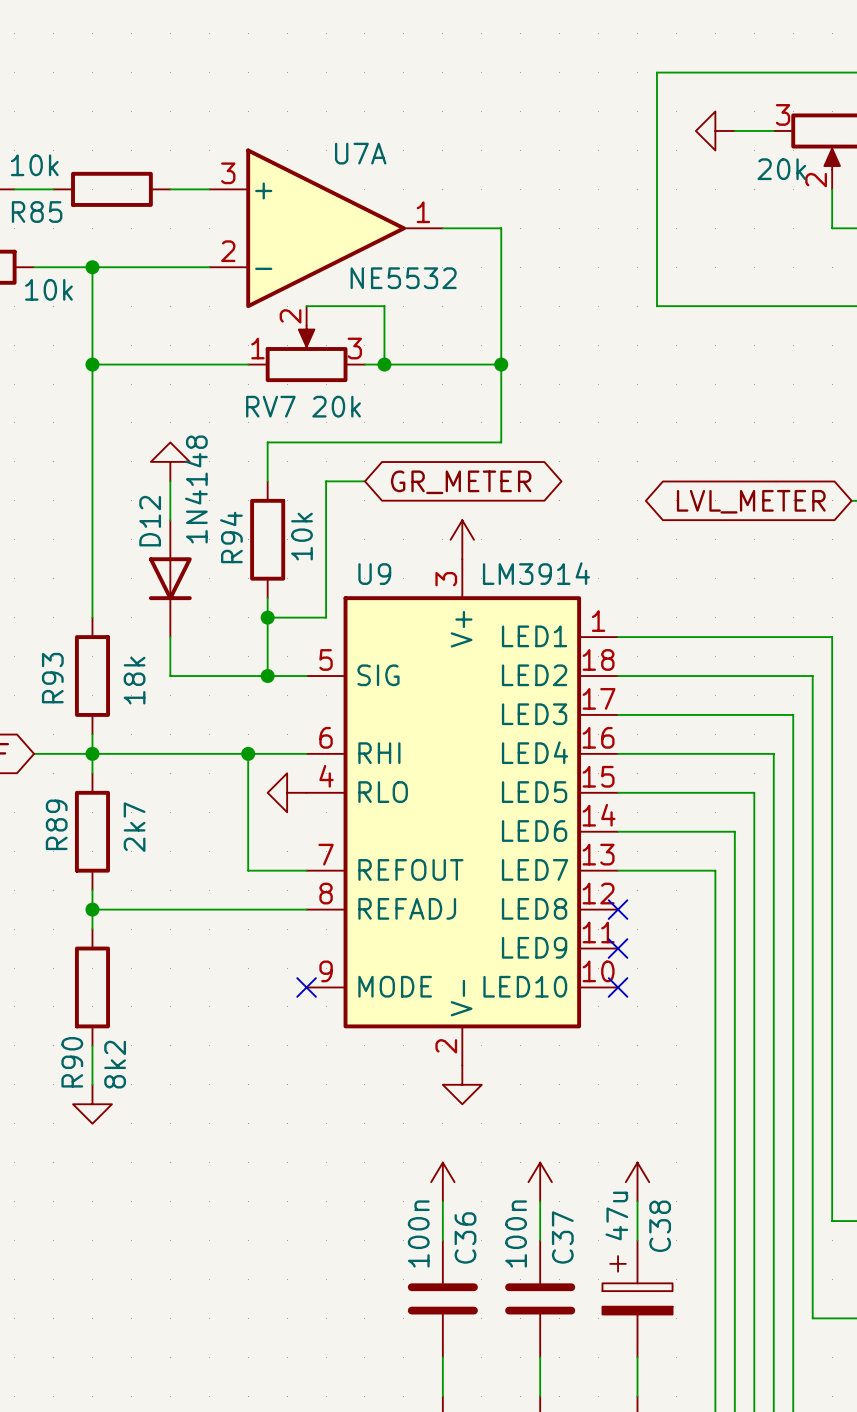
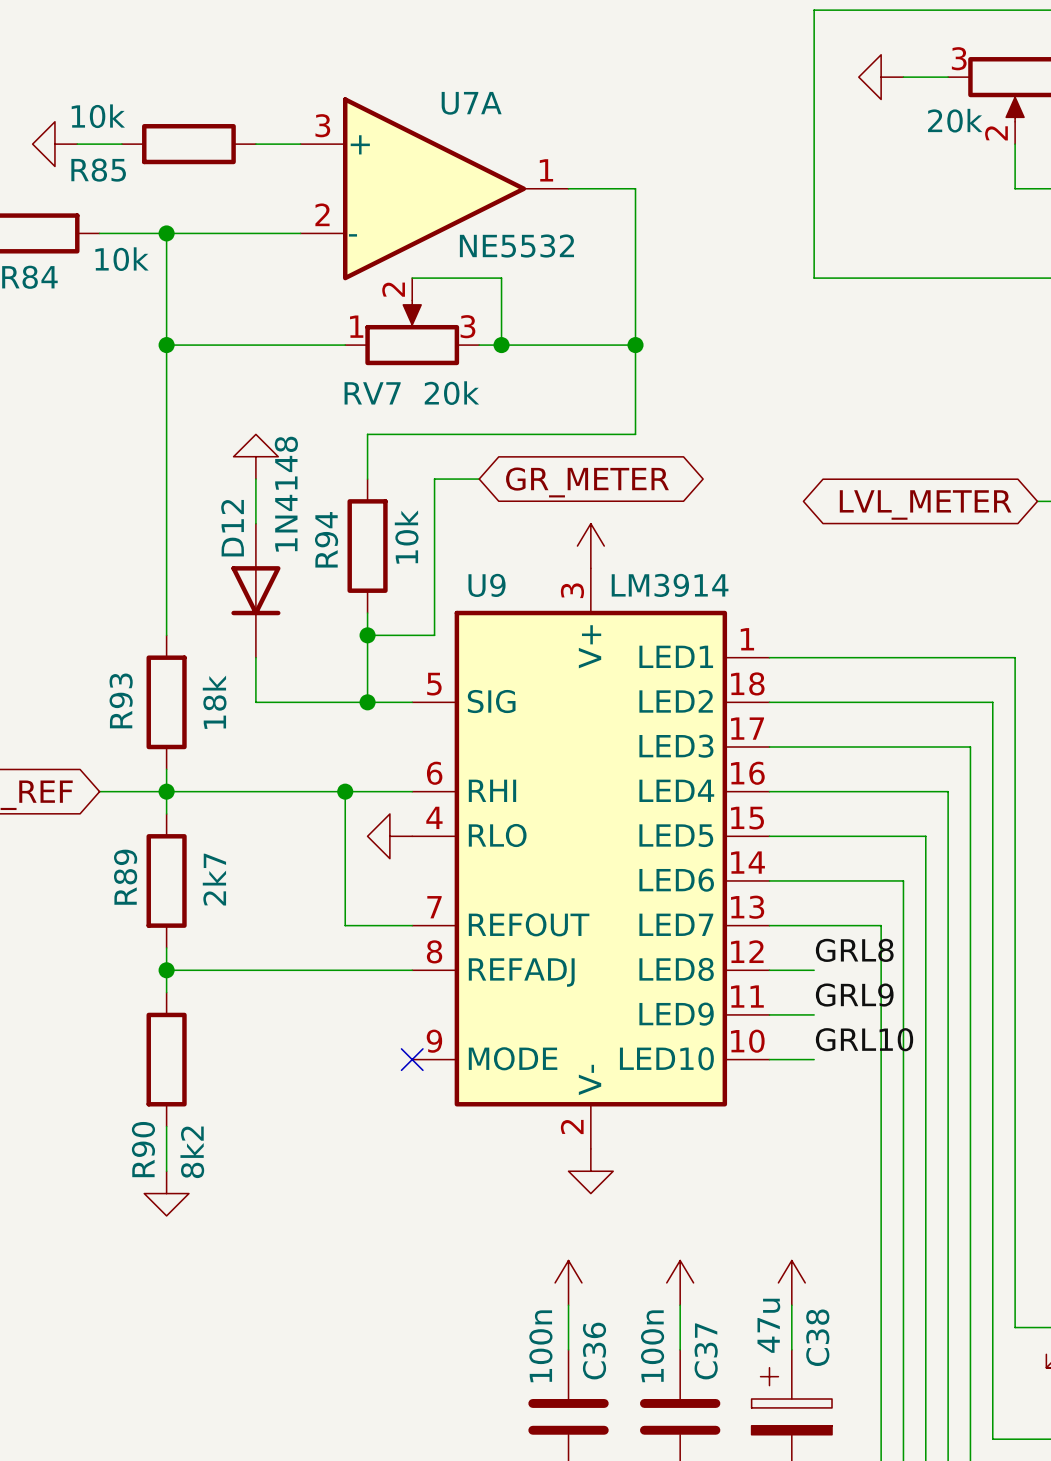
label: none -> GRL8 (854, 950)
wire: none -> (769, 970) (814, 970)
no-connect mark: (618, 909) -> none
label: none -> GRL9 (854, 995)
wire: none -> (769, 1014) (814, 1014)
no-connect mark: (618, 948) -> none
label: none -> GRL10 (864, 1039)
wire: none -> (769, 1059) (814, 1059)
no-connect mark: (618, 987) -> none

